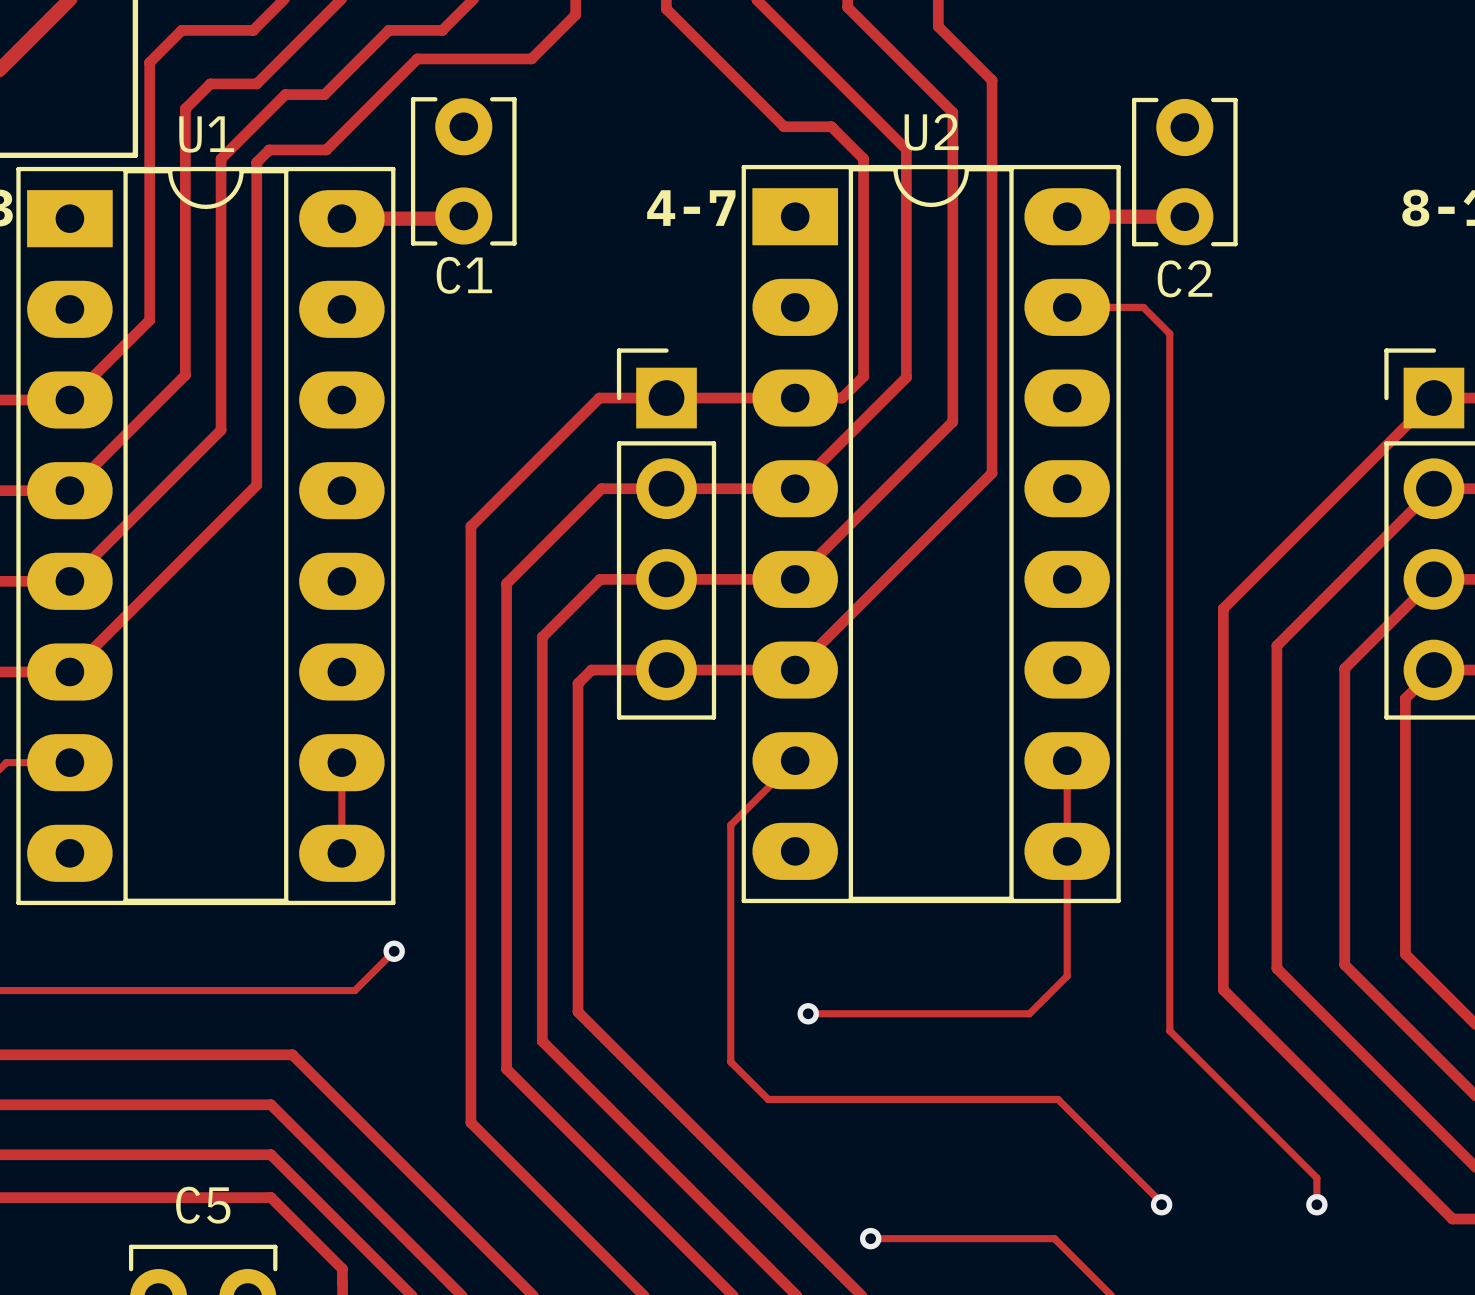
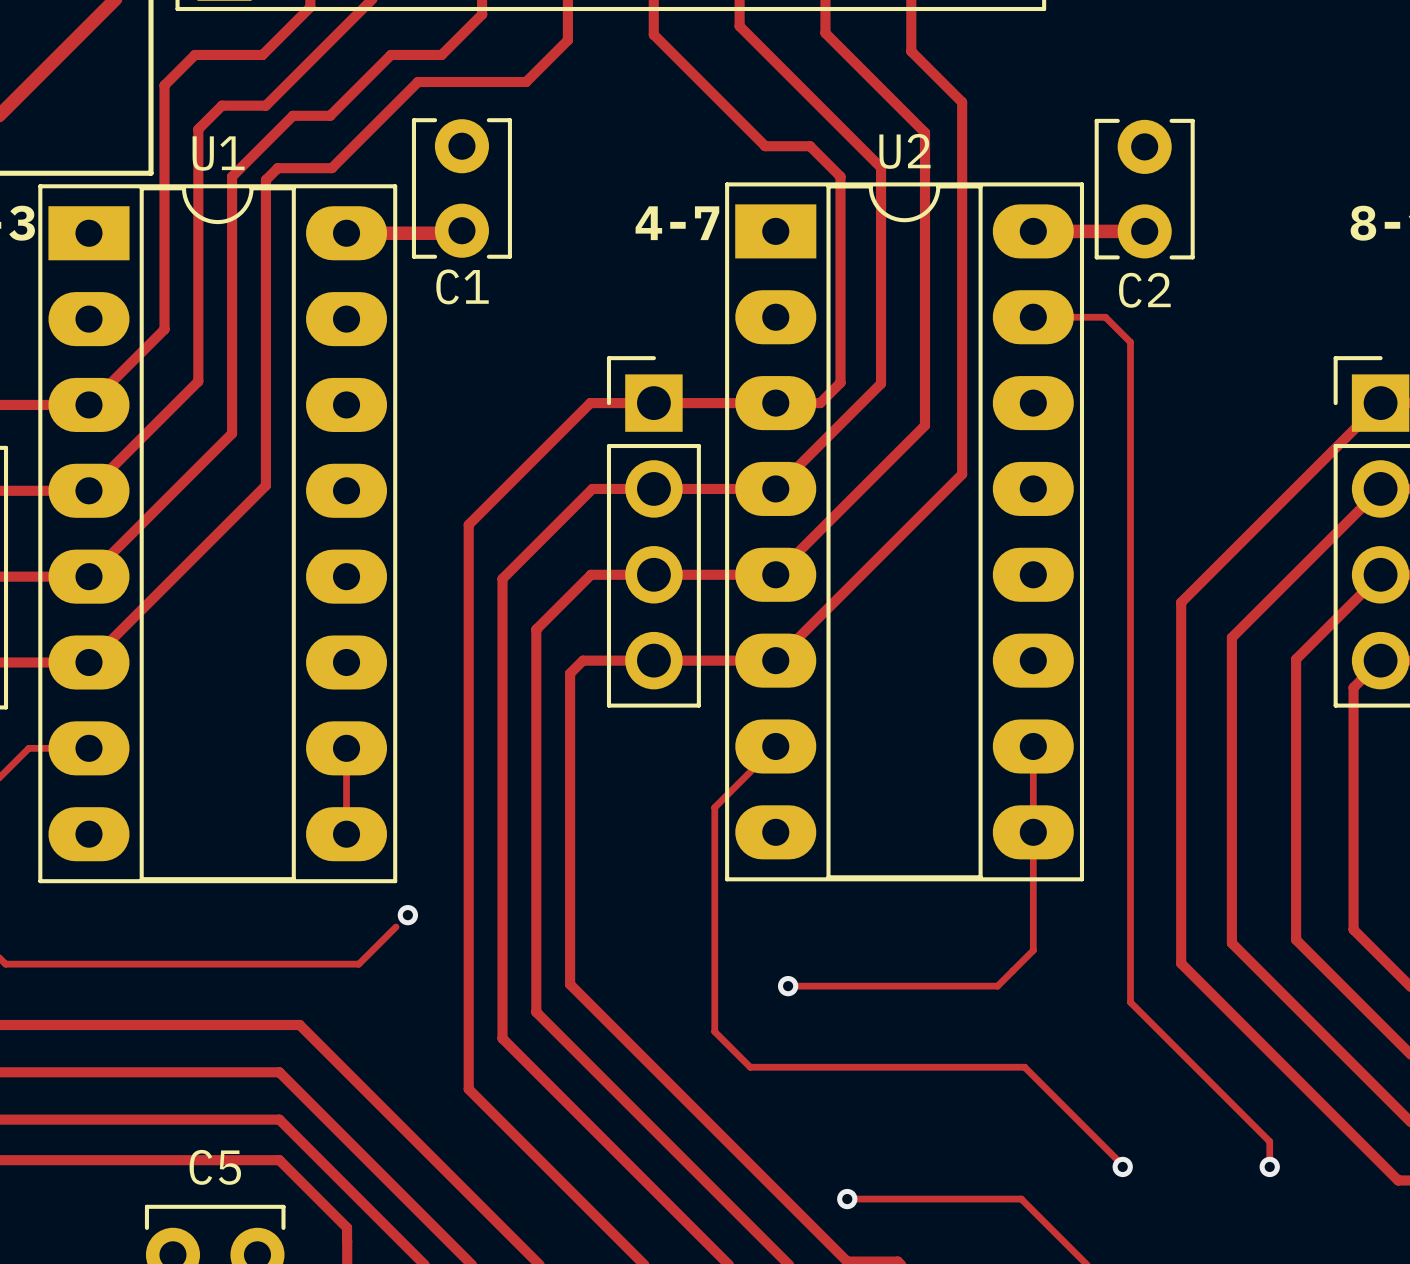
via position: (394, 951) -> (407, 915)

